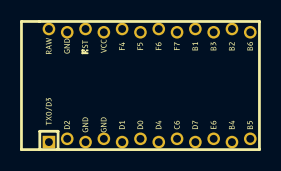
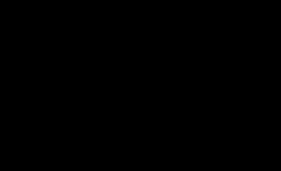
part: (140, 85) -> none

